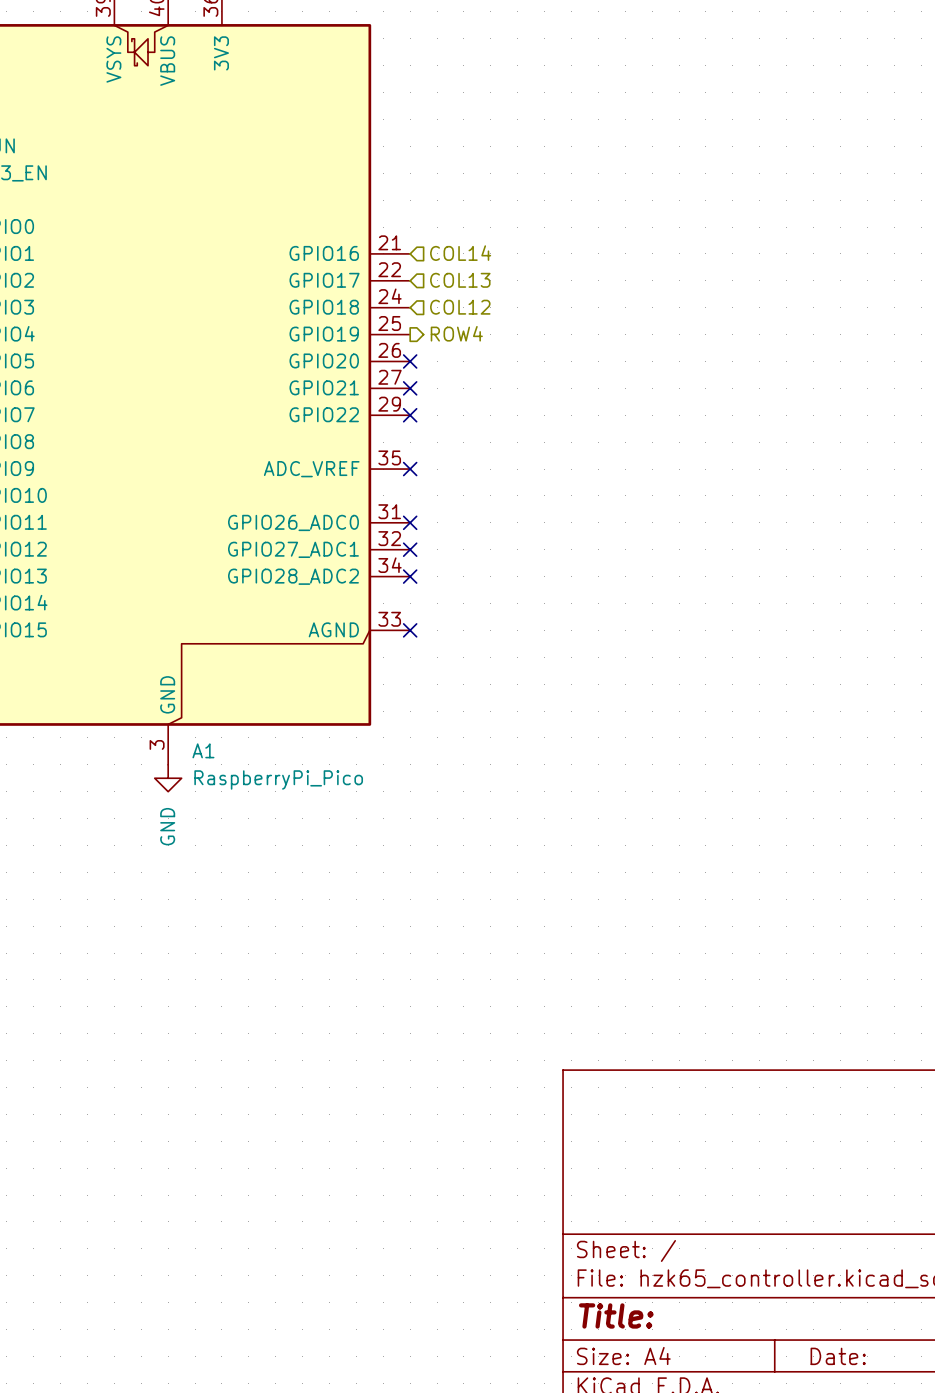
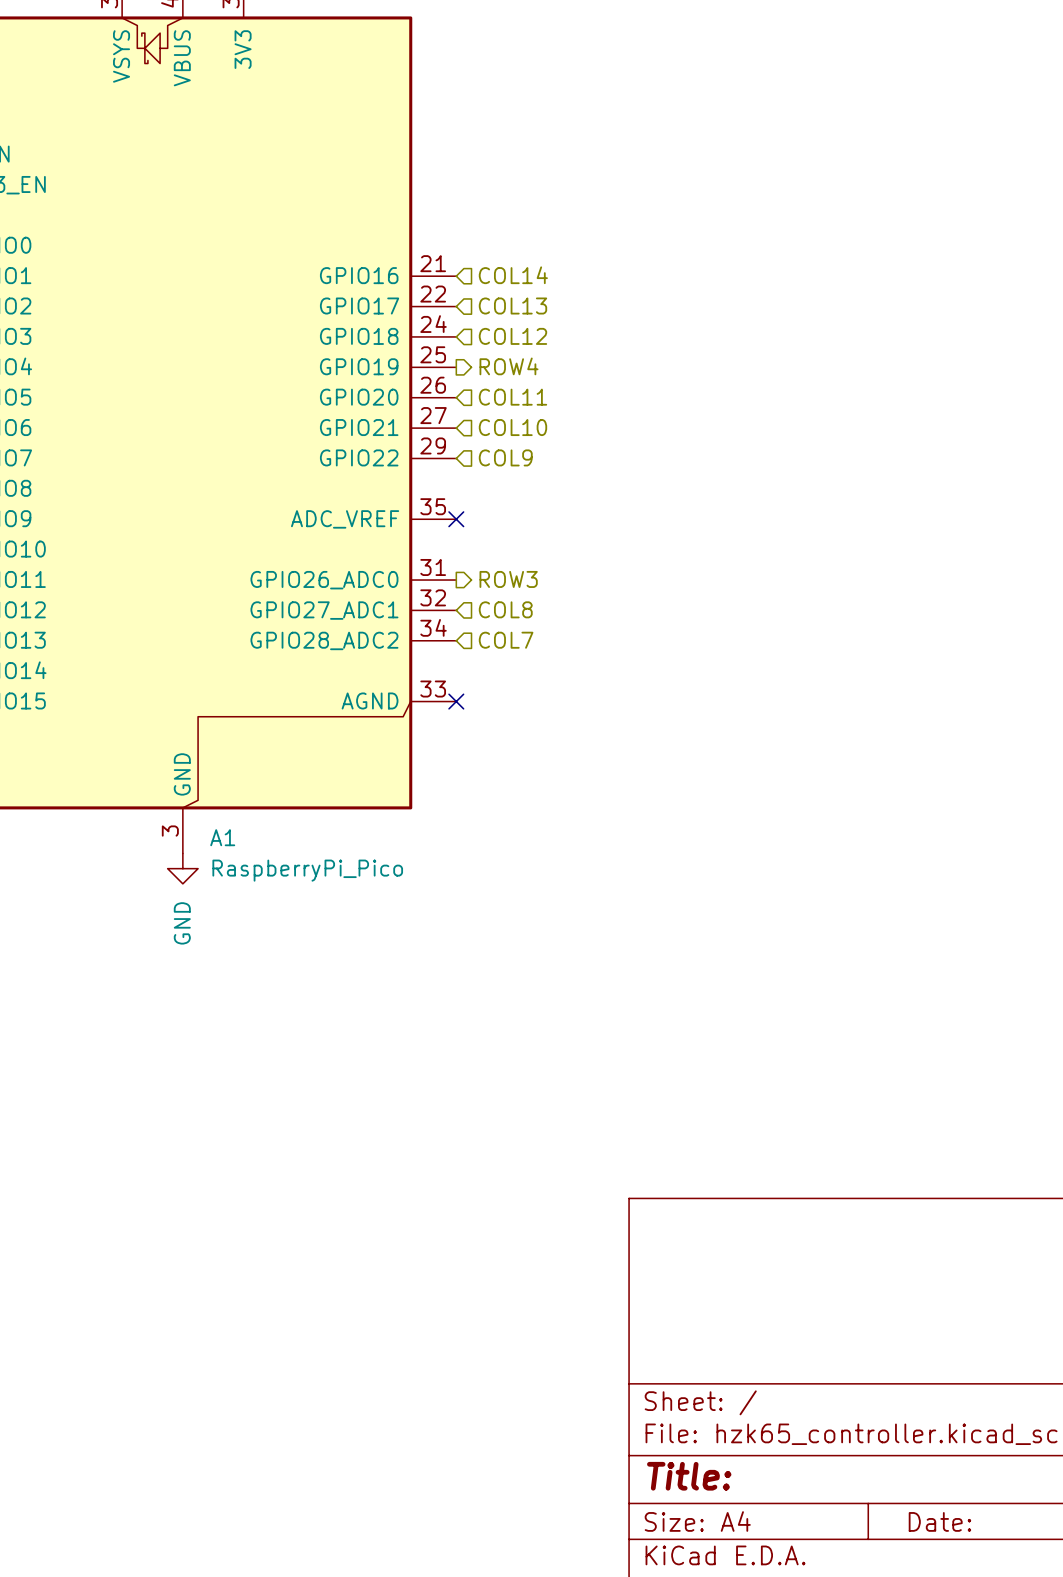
hierarchical label: none -> COL11 (512, 397)
no-connect mark: (410, 361) -> none
hierarchical label: none -> COL10 (512, 427)
no-connect mark: (410, 388) -> none
hierarchical label: none -> COL9 (505, 457)
no-connect mark: (410, 415) -> none
no-connect mark: (410, 522) -> none
hierarchical label: none -> ROW3 (508, 579)
no-connect mark: (410, 549) -> none
hierarchical label: none -> COL8 (505, 609)
no-connect mark: (410, 576) -> none
hierarchical label: none -> COL7 (506, 640)

